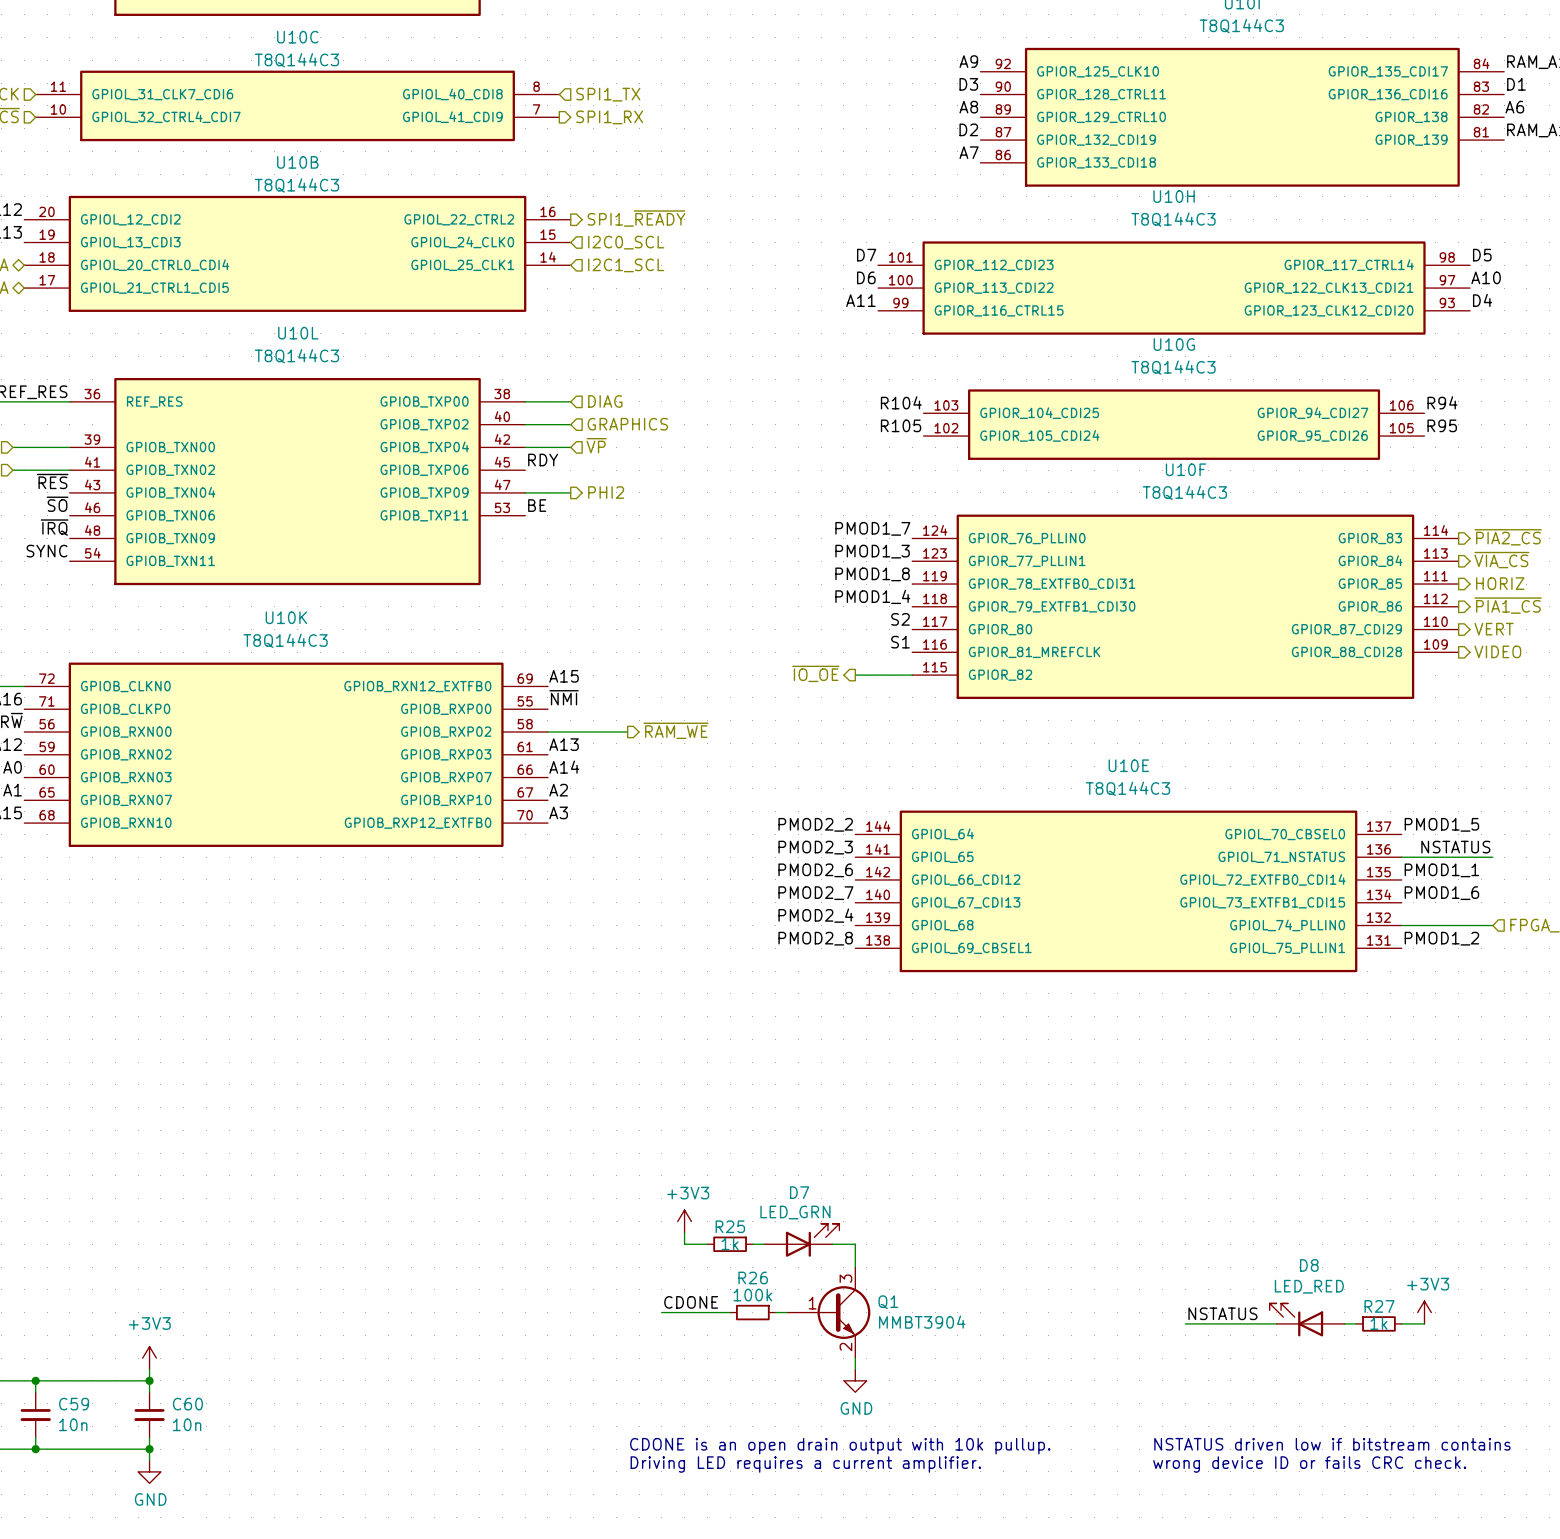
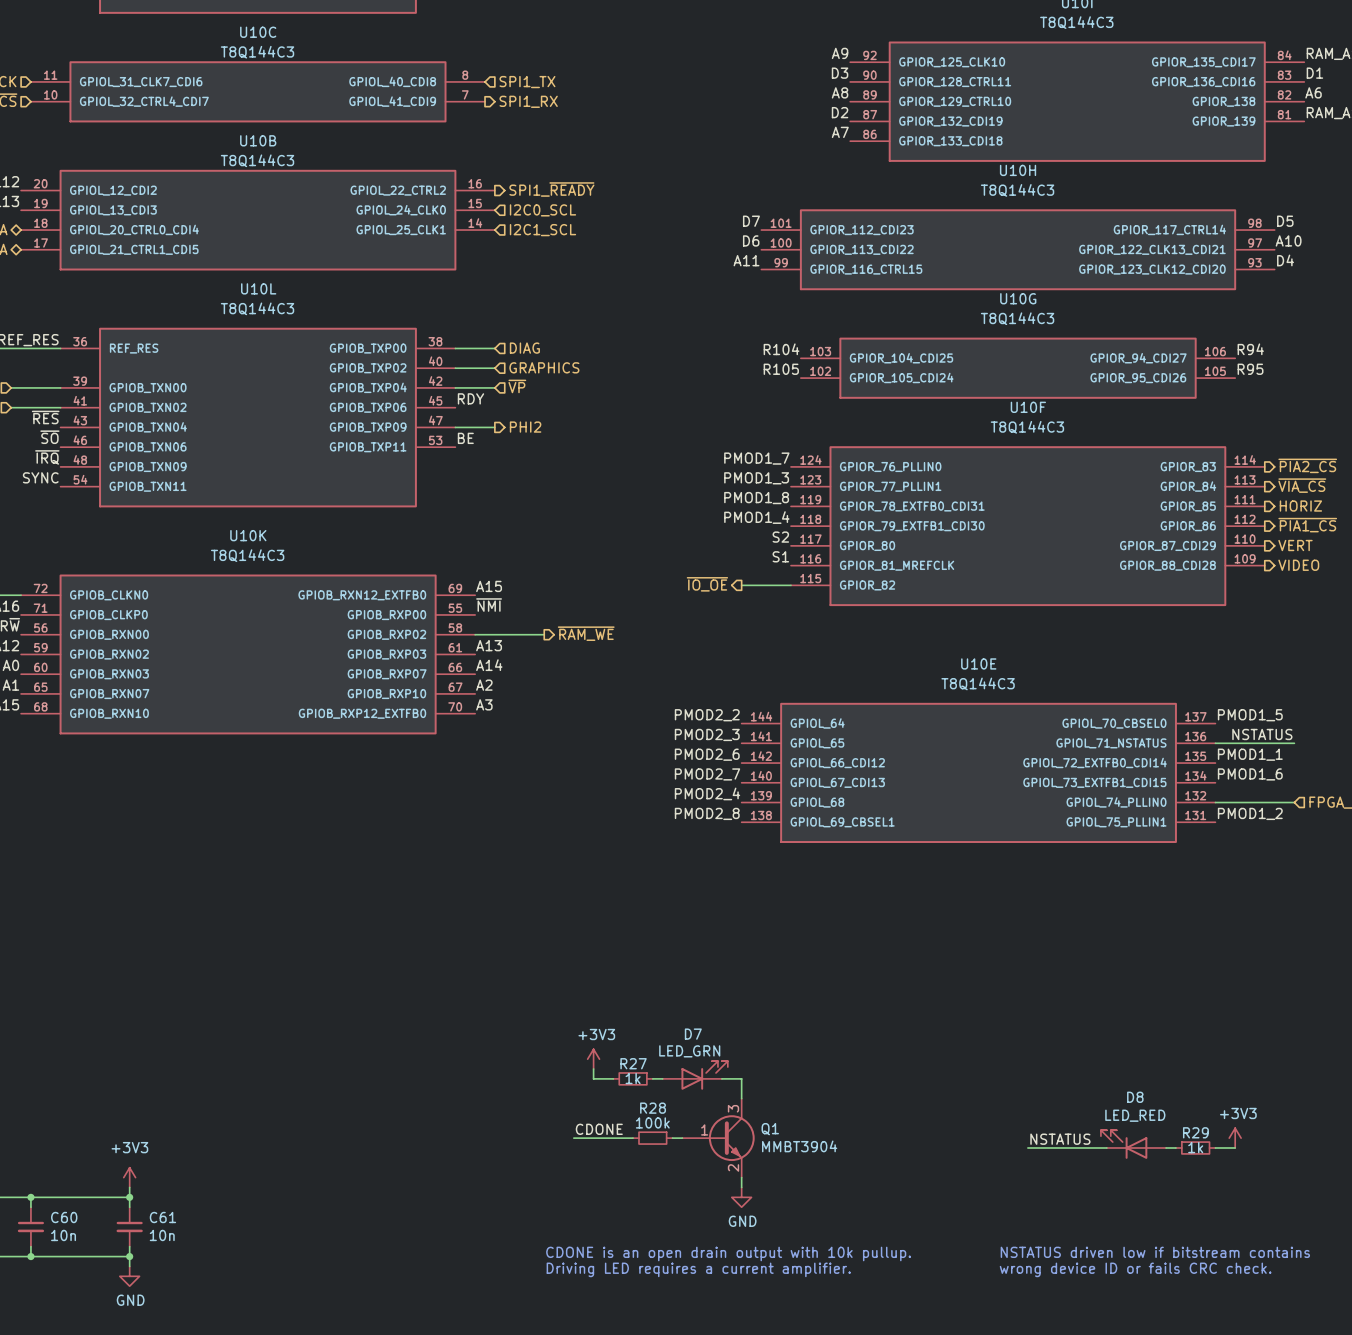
R25 name: R25 (730, 1226) -> R27 (633, 1063)
R26 name: R26 (753, 1277) -> R28 (653, 1108)
R27 name: R27 (1379, 1306) -> R29 (1195, 1132)
C59 name: C59 (74, 1404) -> C60 (64, 1217)
C60 name: C60 (187, 1404) -> C61 (162, 1217)

